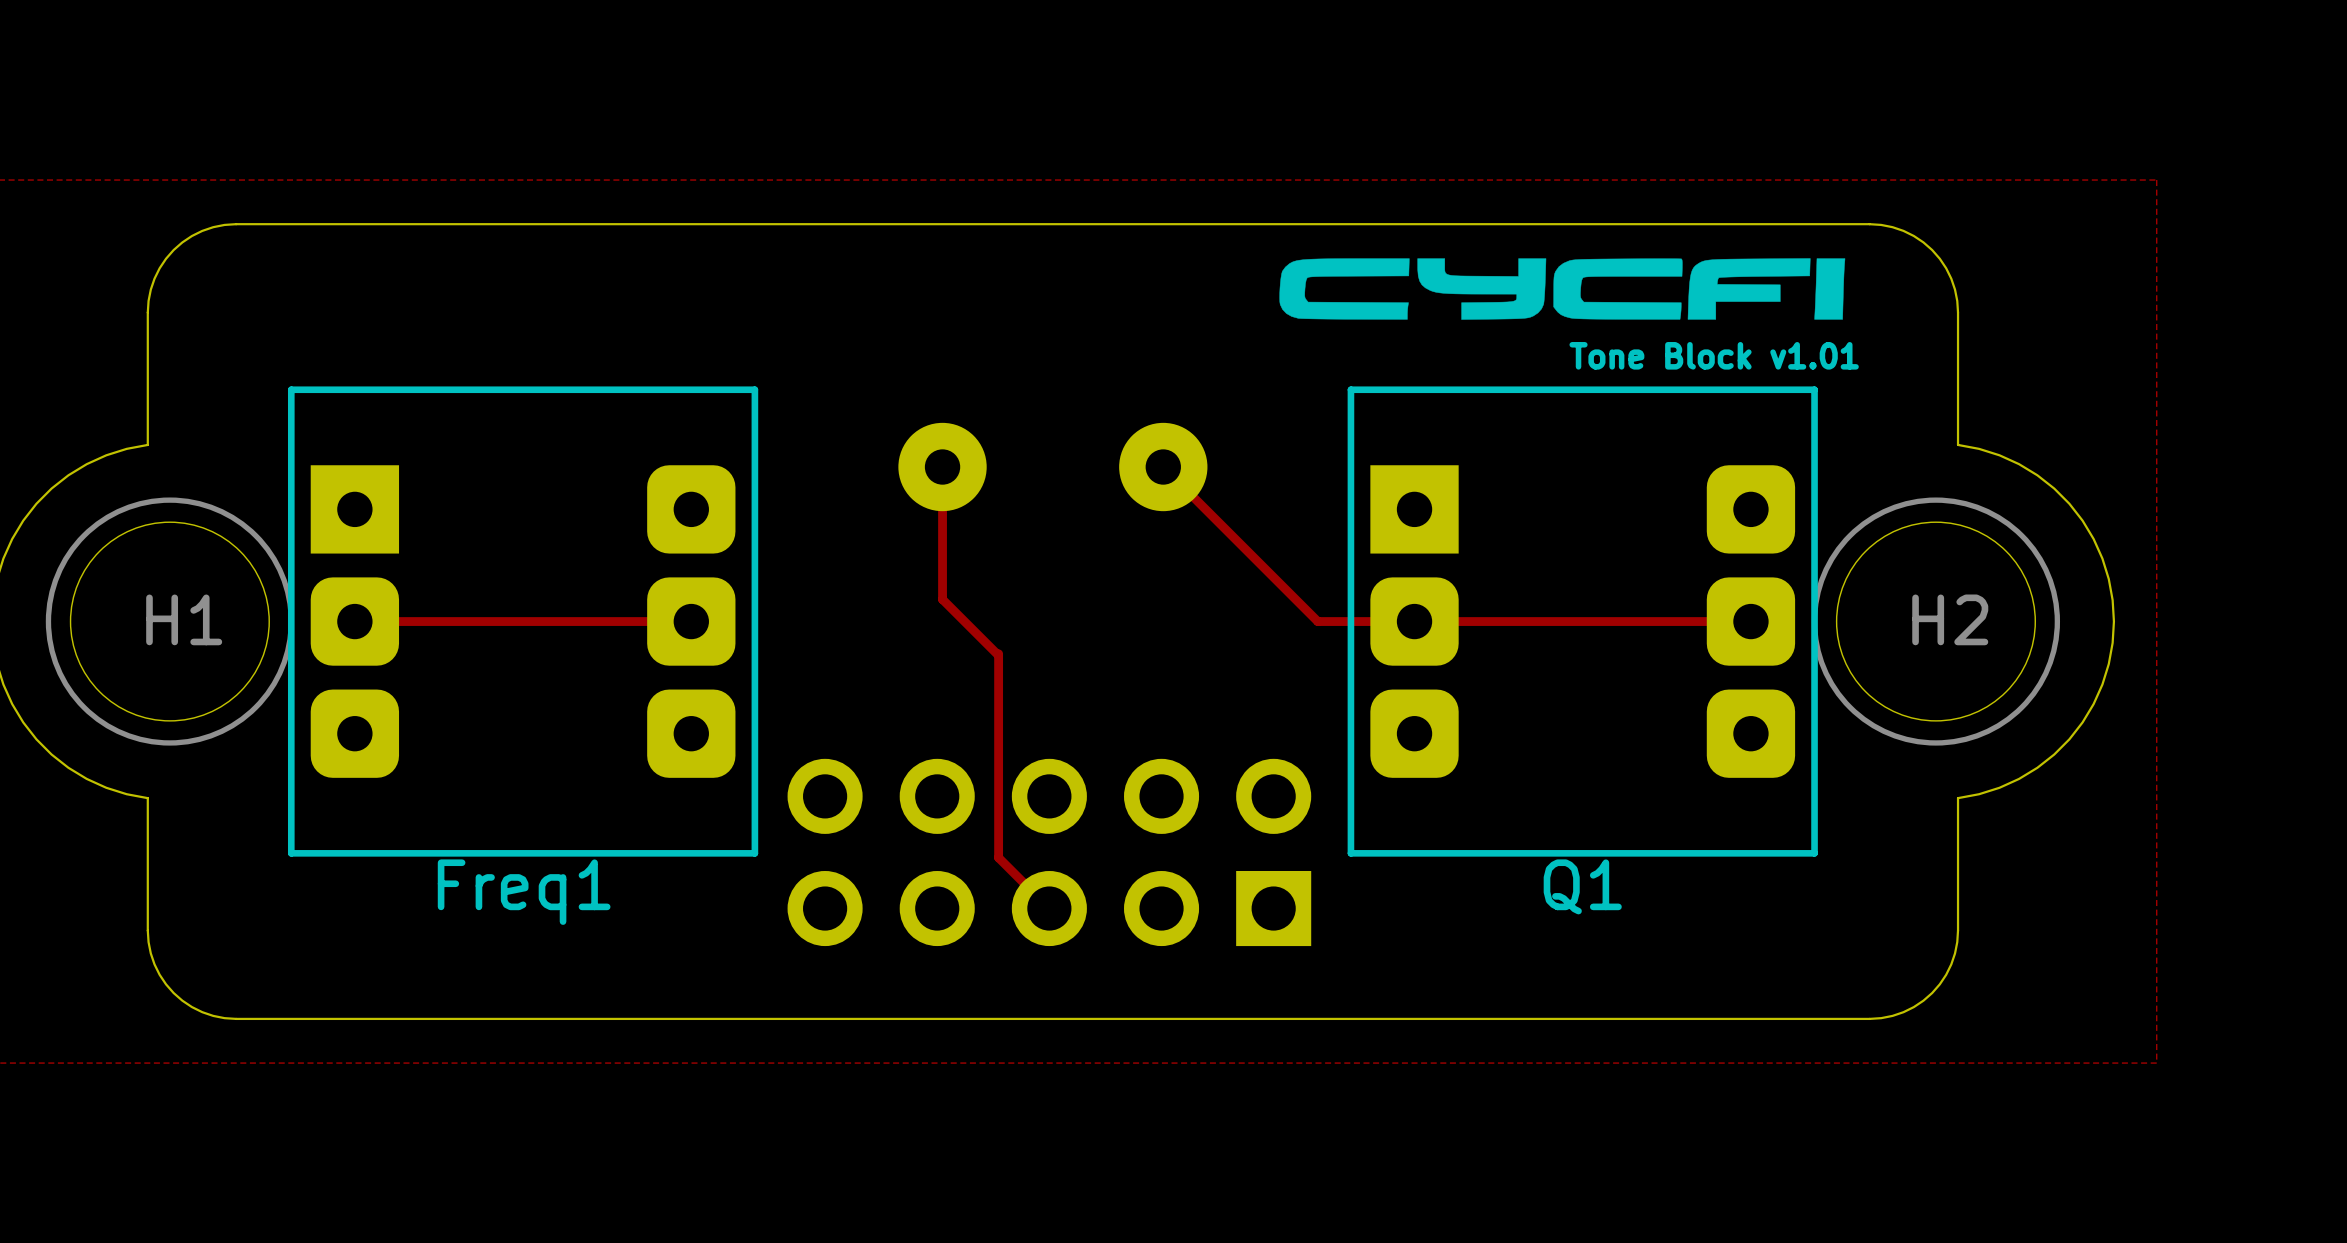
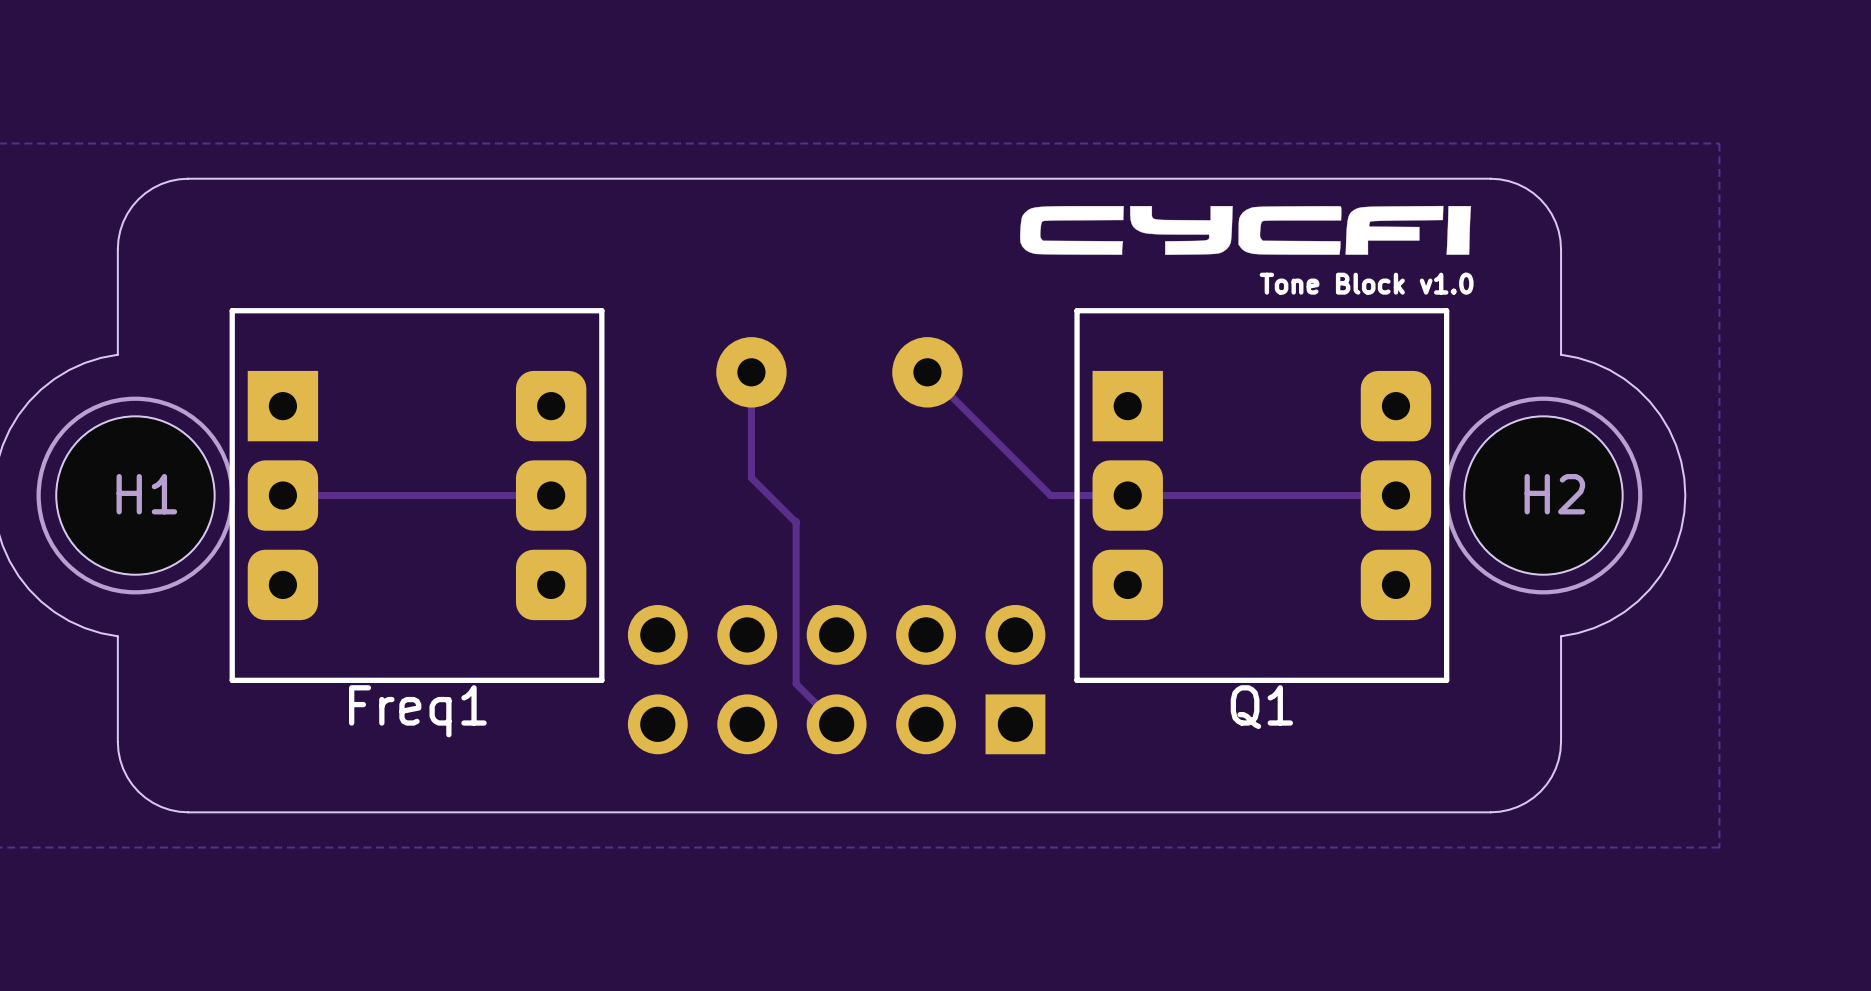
text: Tone Block v1.01 (1714, 355) -> Tone Block v1.0 (1366, 283)

